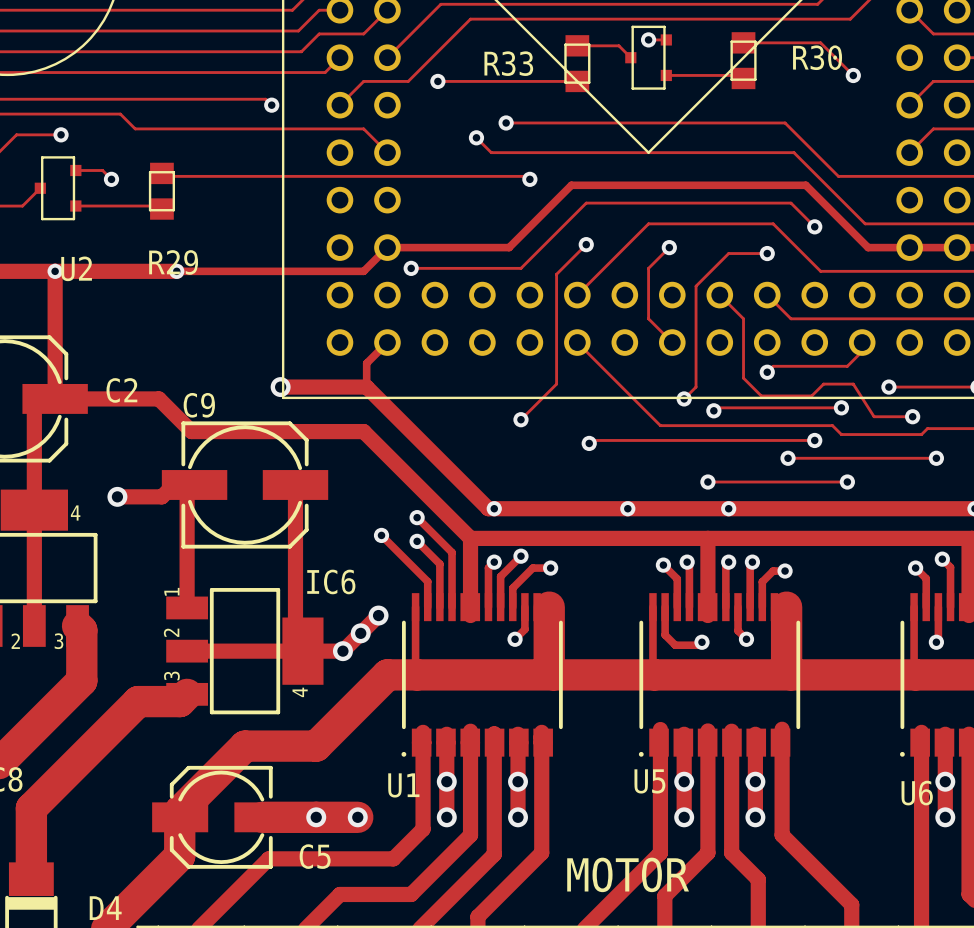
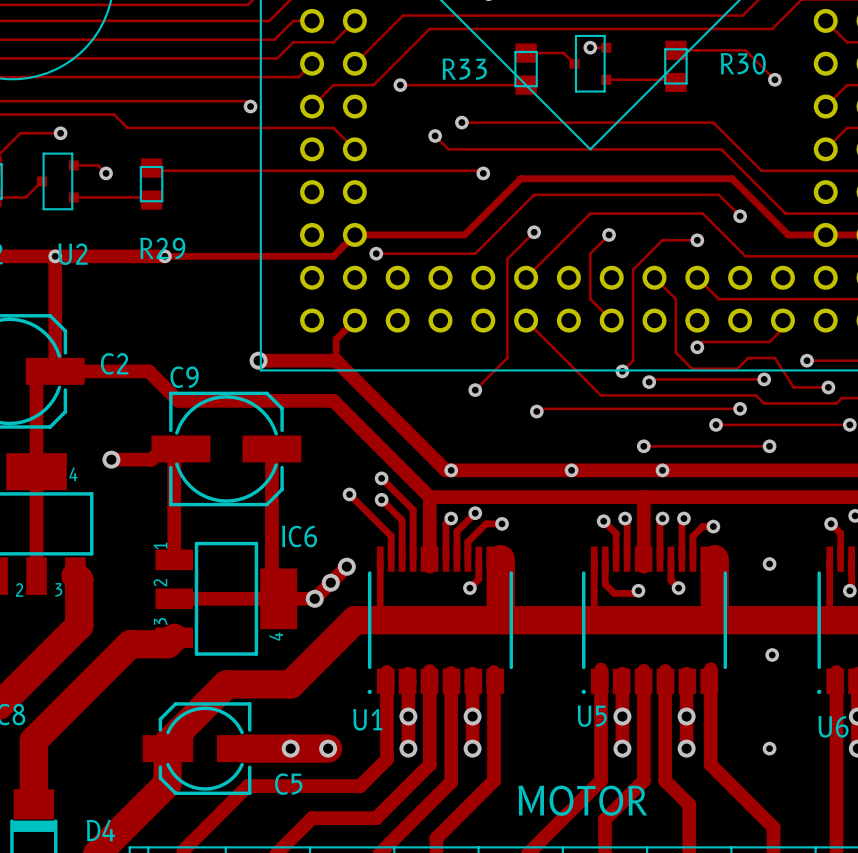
via: none -> (769, 564)
via: none -> (772, 654)
via: none -> (769, 748)

